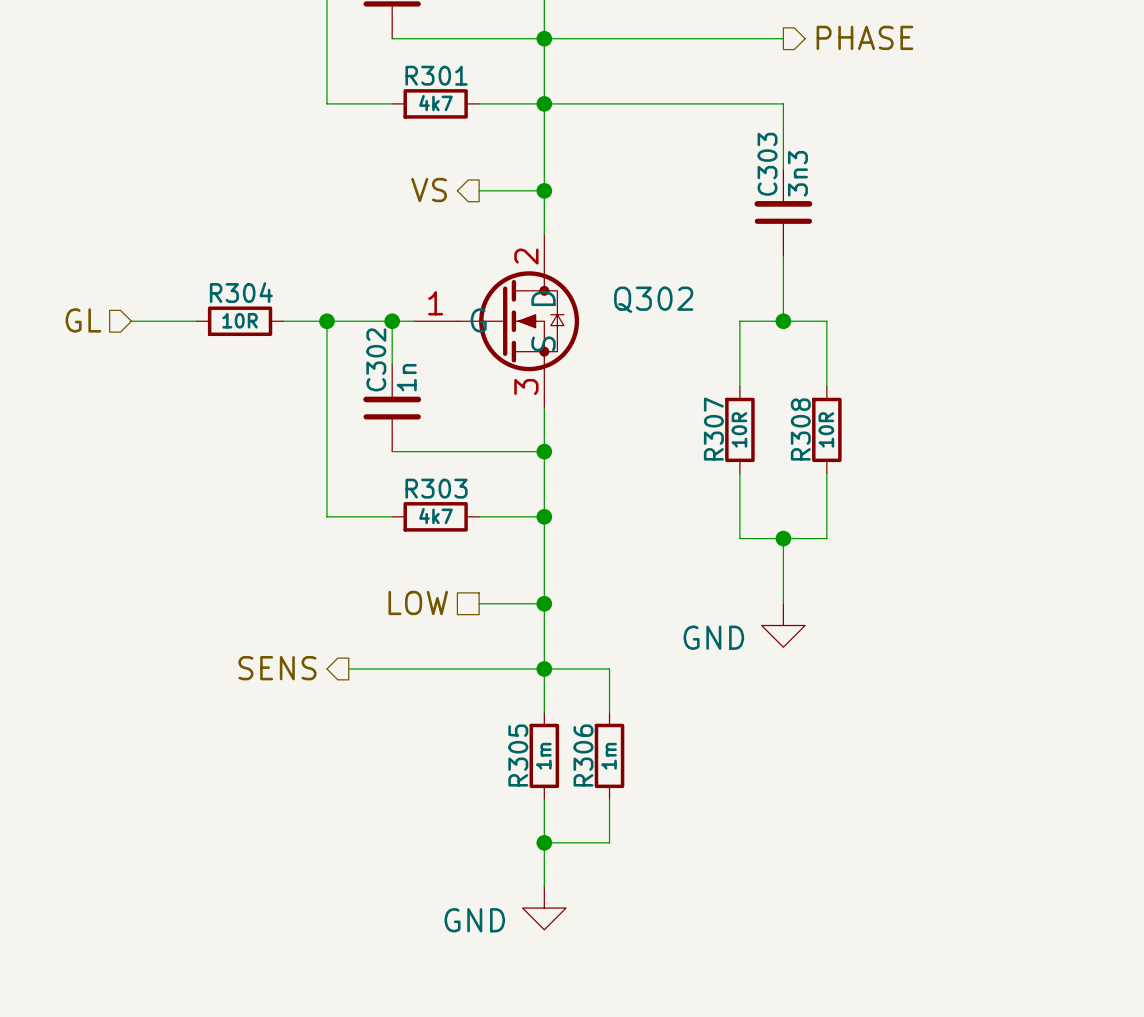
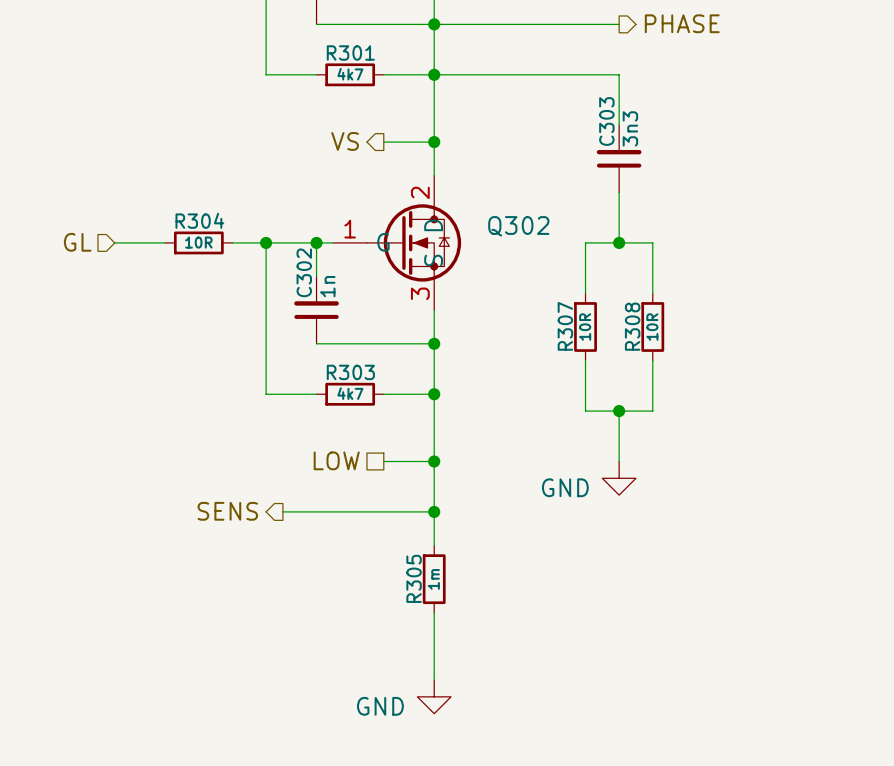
wire: (544, 668) (609, 668) (609, 712) -> none
R306: 1m (609, 755) -> none
wire: (609, 799) (609, 842) (544, 842) -> none
junction: (544, 842) -> none

